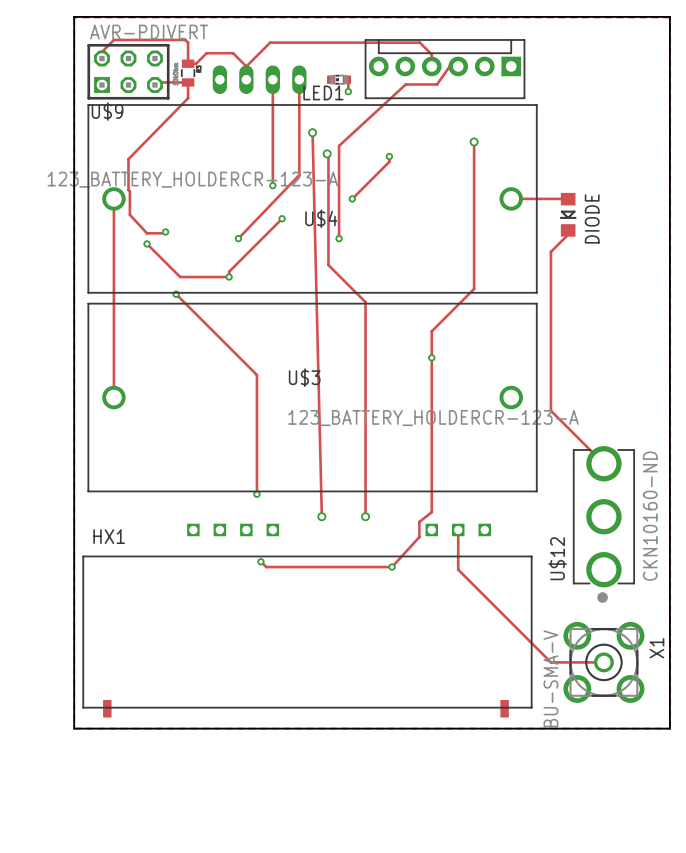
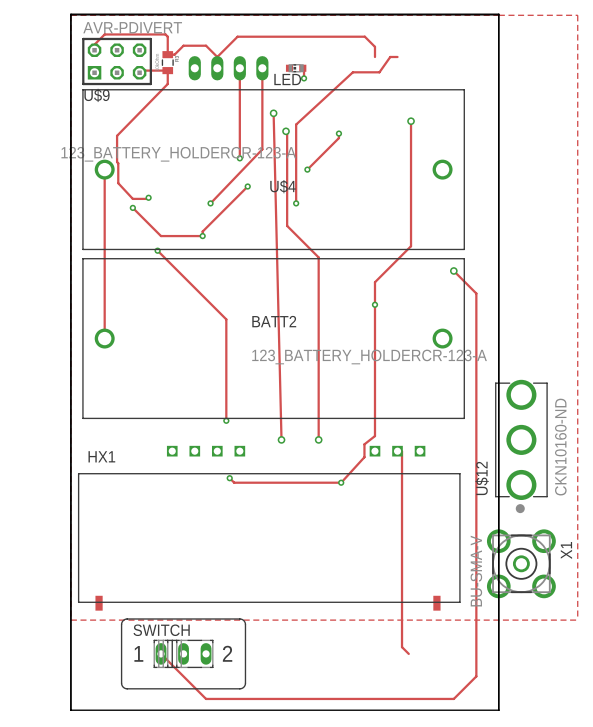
board edge: (577, 16) (669, 16) (669, 728) (74, 728) -> (498, 14) (498, 710)
part: (445, 69) -> none
LED1 name: LED1 (323, 92) -> LED (287, 79)
track: (511, 198) (568, 199) -> none
DIODE: (568, 214) -> none
track: (568, 230) (568, 234) (550, 251) (550, 344) -> (453, 270) (476, 293)
via: none -> (453, 270)
U$3 name: U$3 (304, 377) -> BATT2 (274, 321)
track: (550, 410) (603, 463) -> (476, 349) (476, 676) (453, 698) (206, 698) (161, 653)
track: (458, 529) (458, 569) (550, 662) (603, 662) -> none
track: none -> (402, 451) (402, 647) (408, 653)
board edge: none -> (70, 620) (70, 710)
SWITCH: none -> (183, 653)
board edge: none -> (70, 710) (498, 710) (498, 14) (70, 14) (70, 710)

